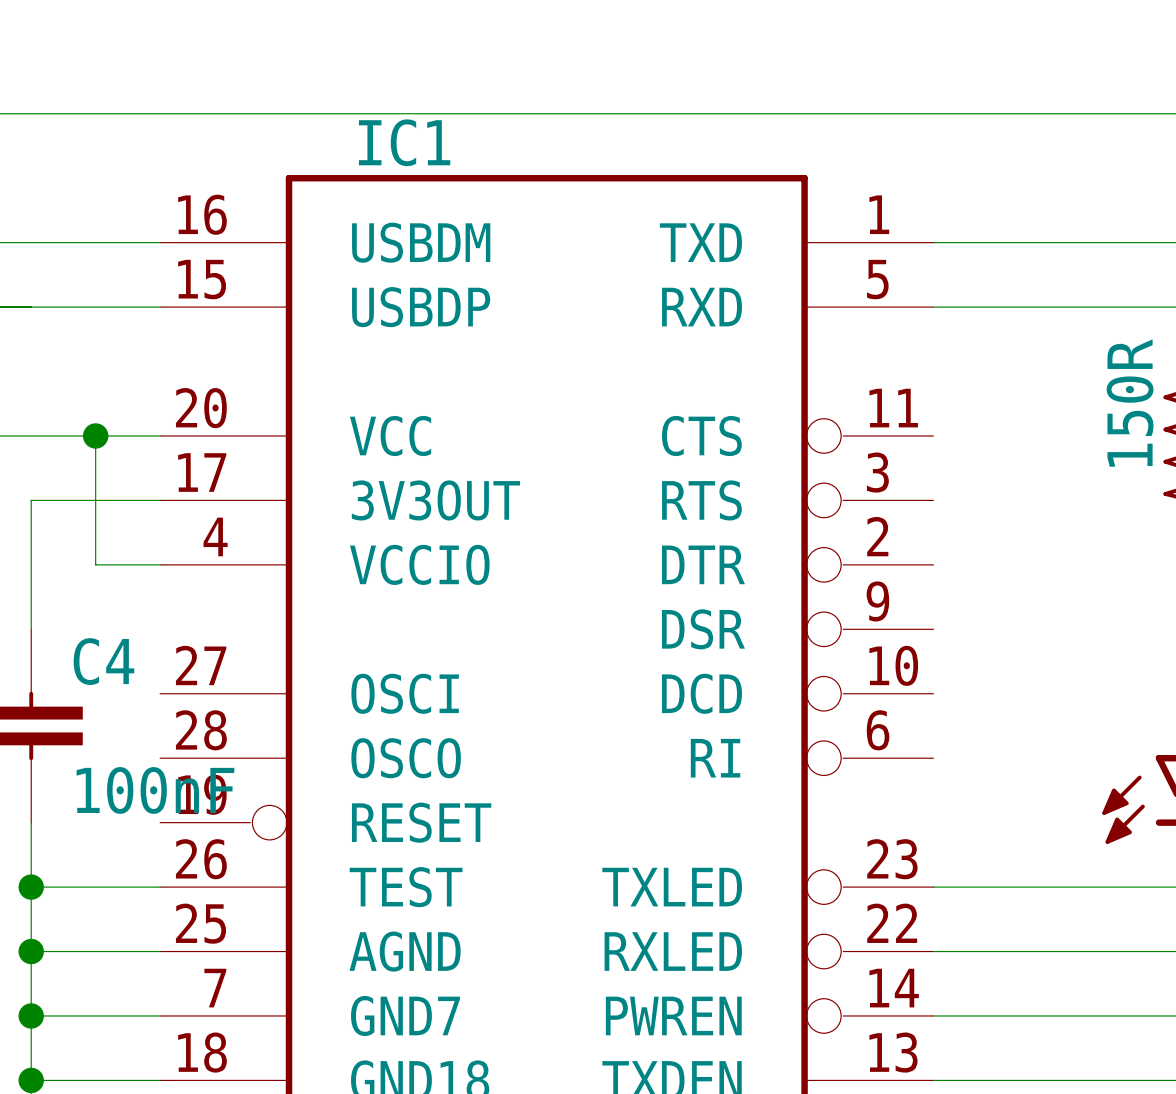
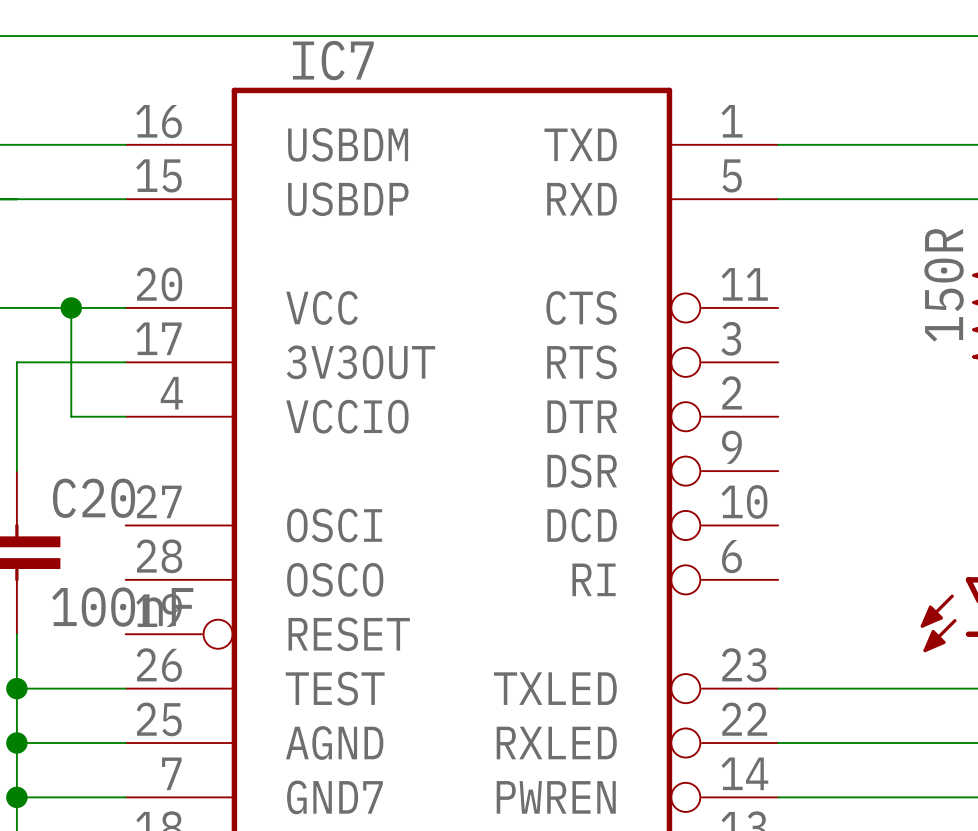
IC1 name: IC1 (404, 142) -> IC7 (333, 60)
C4 name: C4 (103, 661) -> C20 (94, 498)

